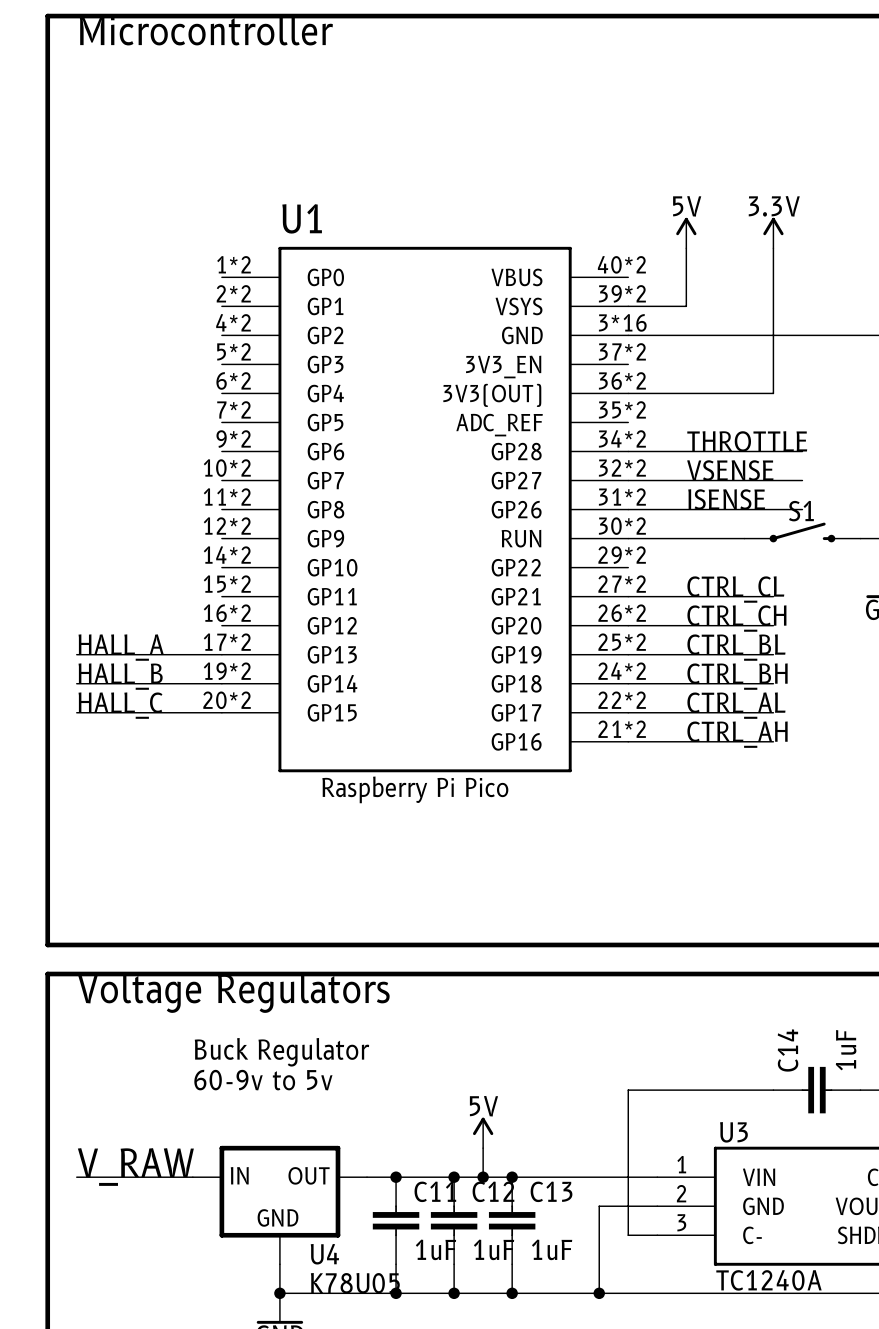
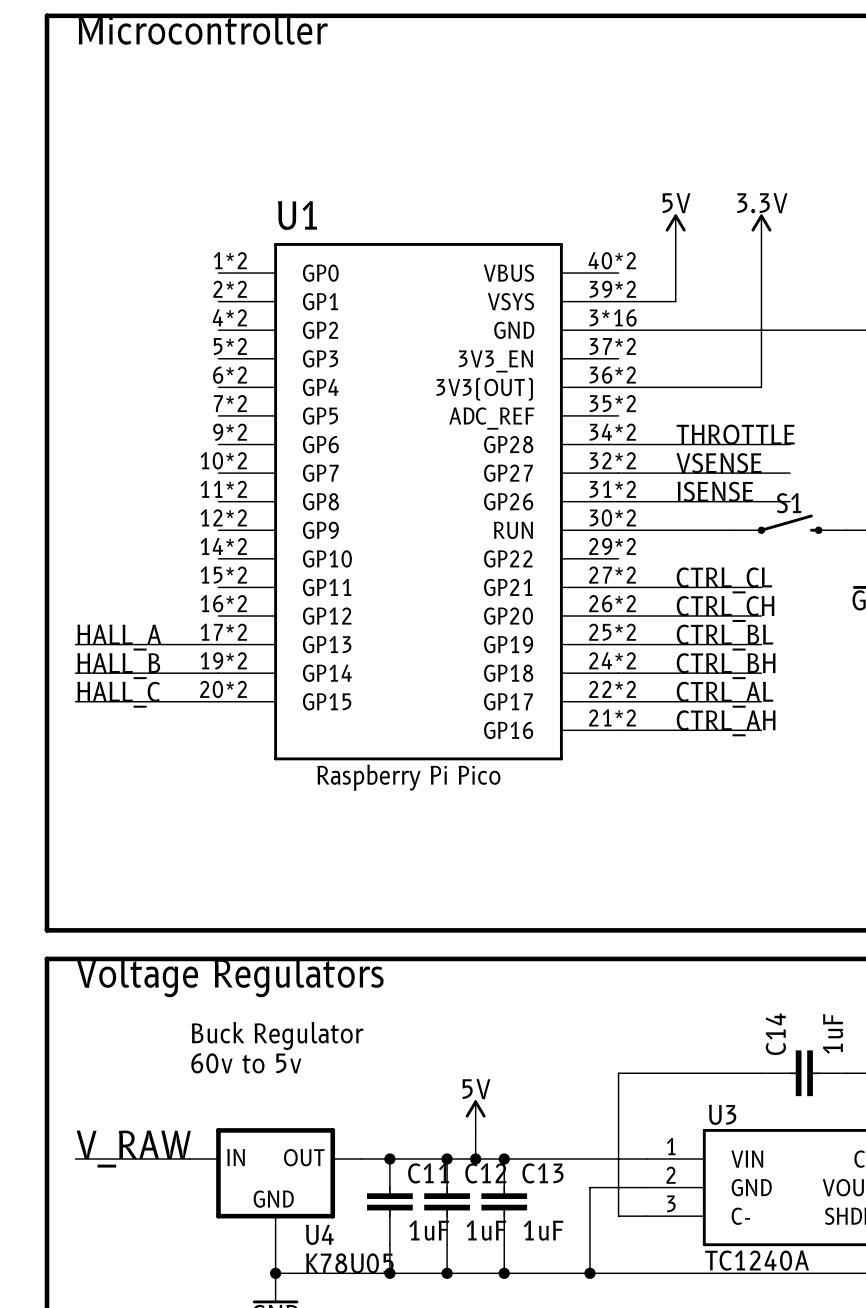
text: 60-9v to 5v (263, 1080) -> 60v to 5v (246, 1063)

